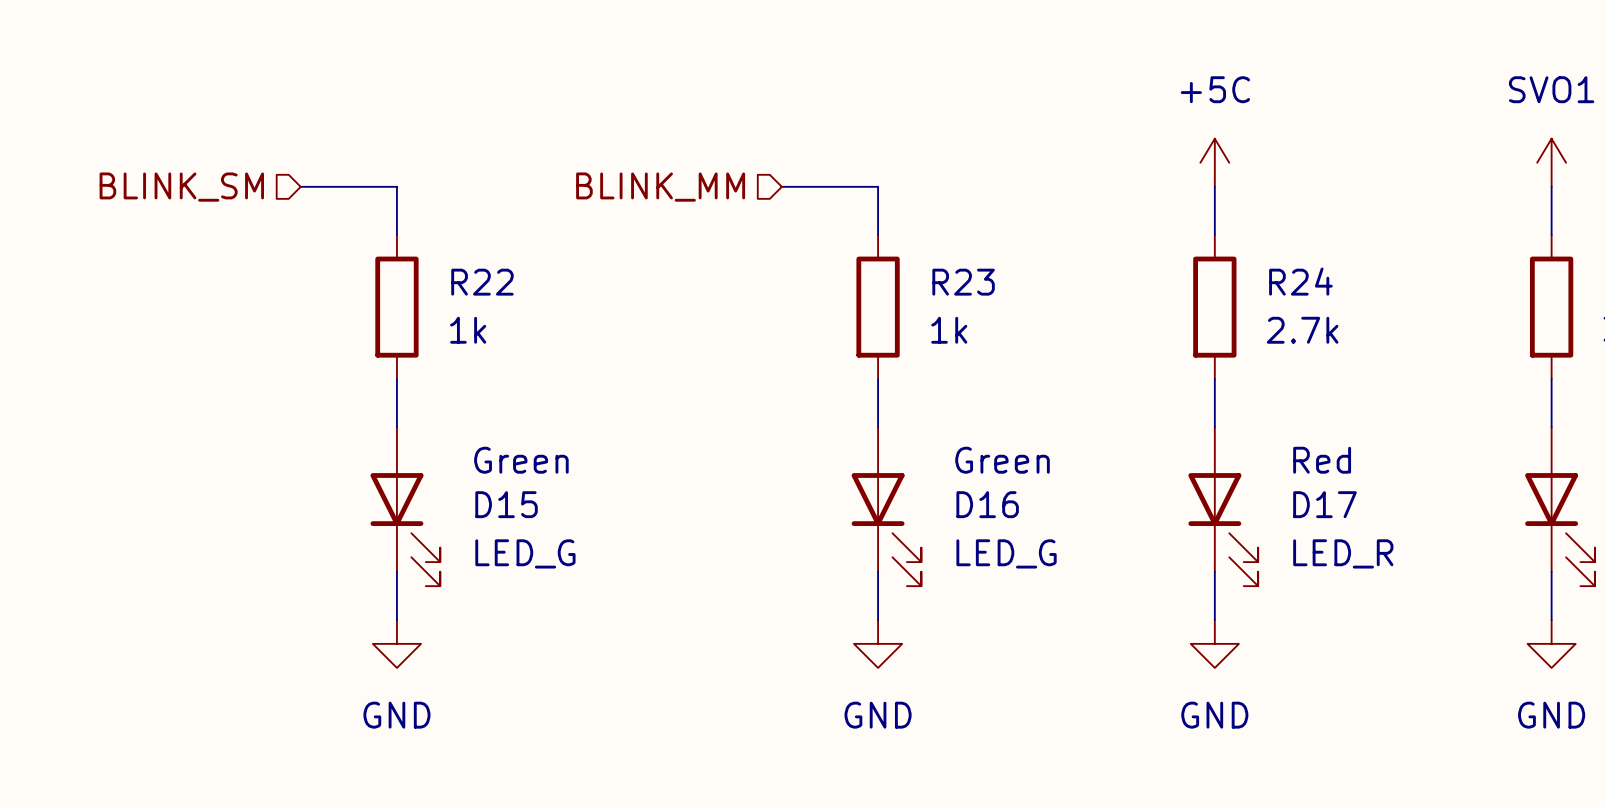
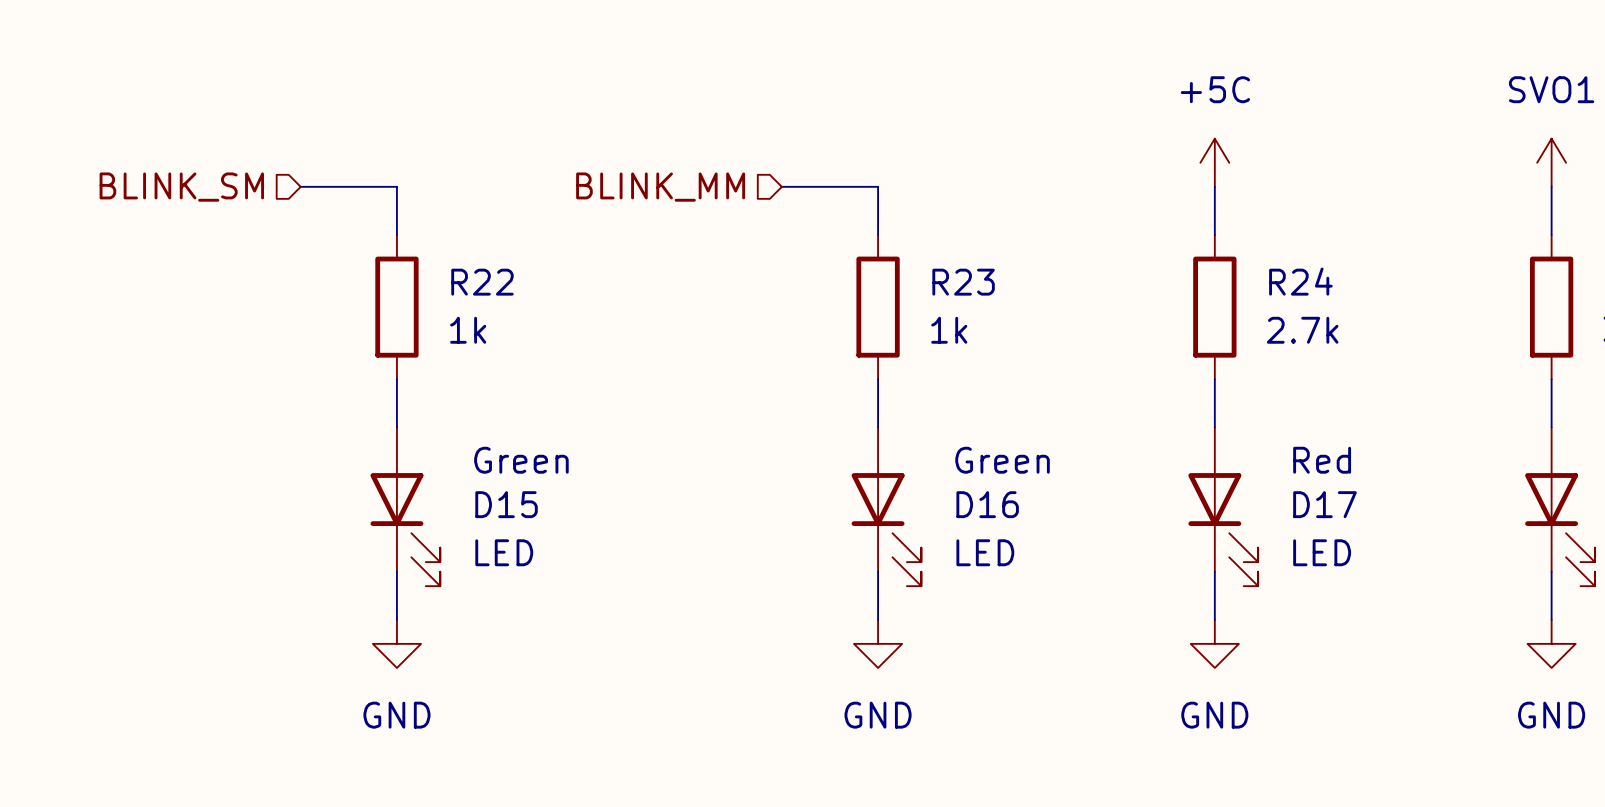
D15 value: LED_G (525, 553) -> LED (504, 552)
D16 value: LED_G (1006, 553) -> LED (985, 552)
D17 value: LED_R (1343, 553) -> LED (1322, 552)

